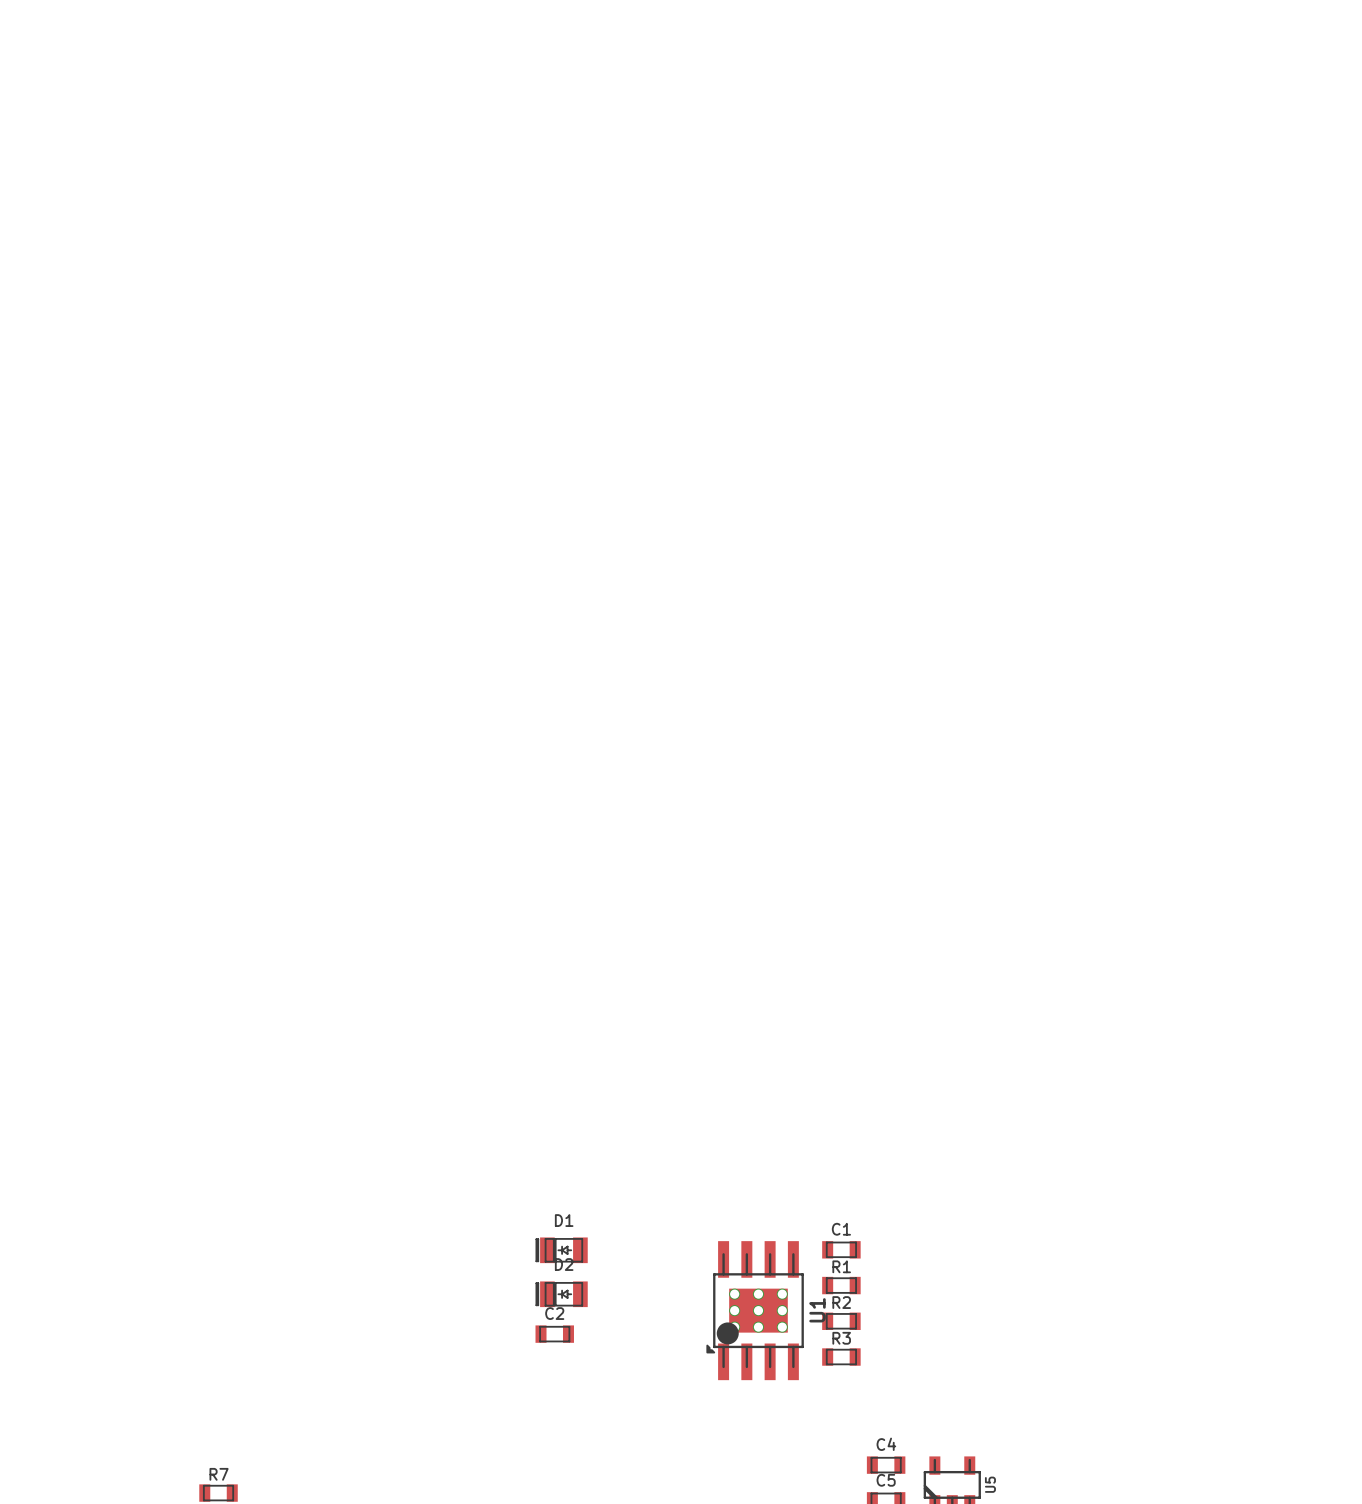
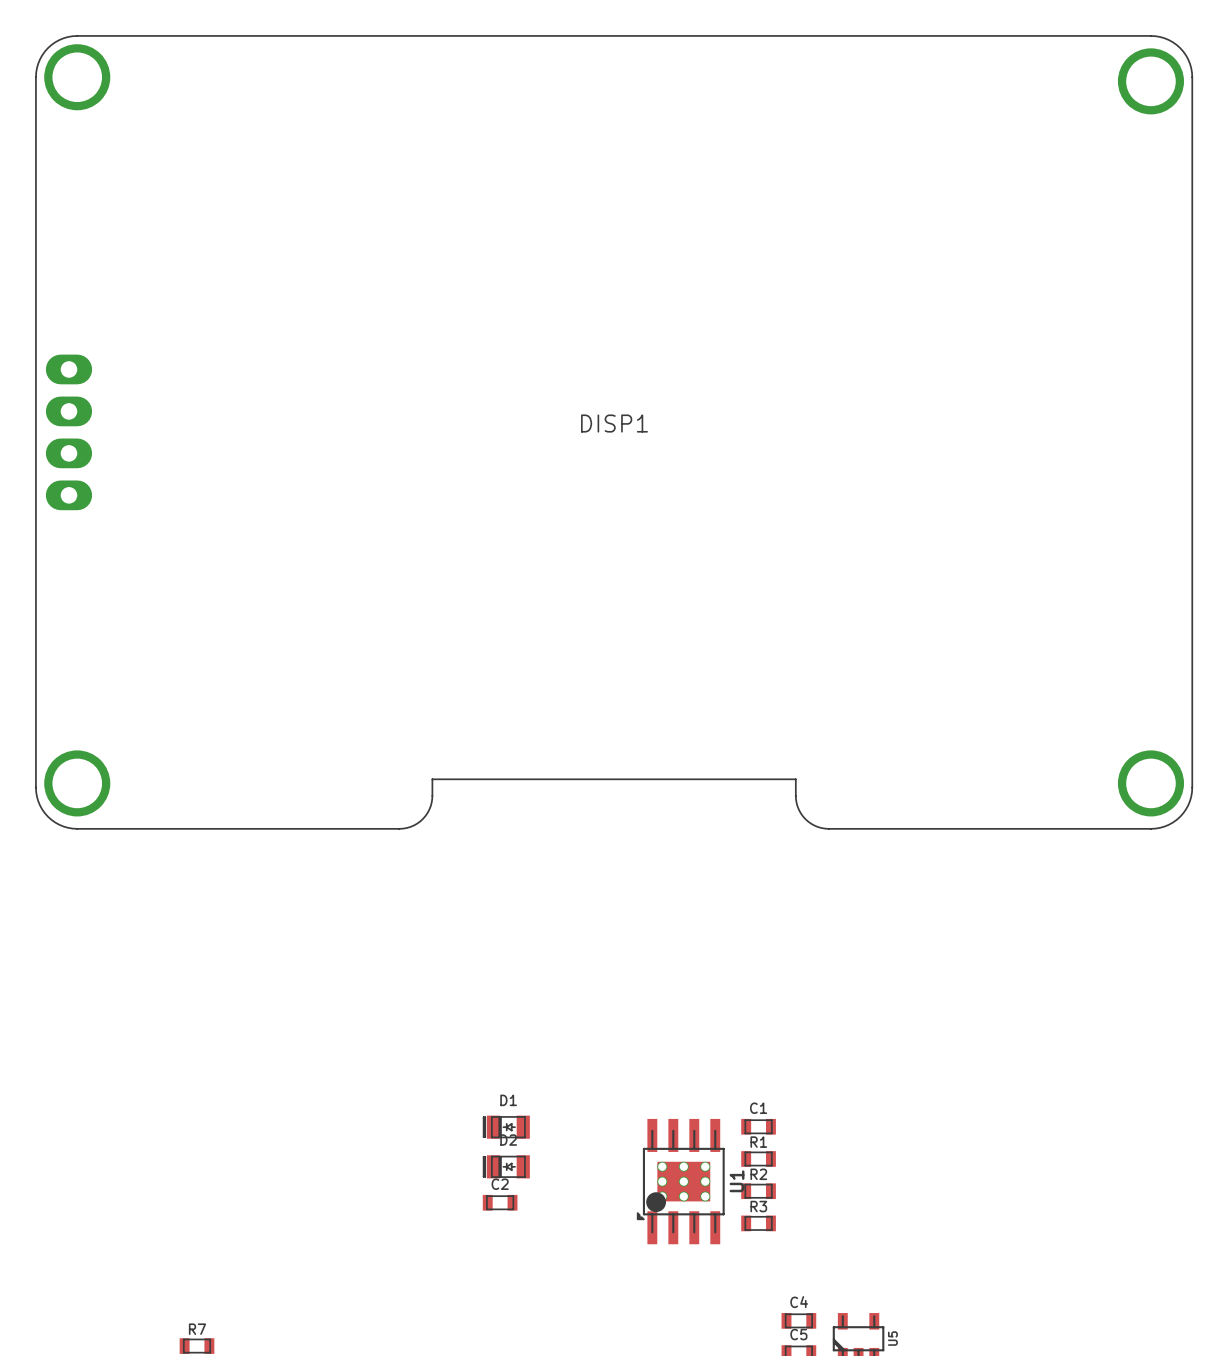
DISP1: none -> (614, 432)

